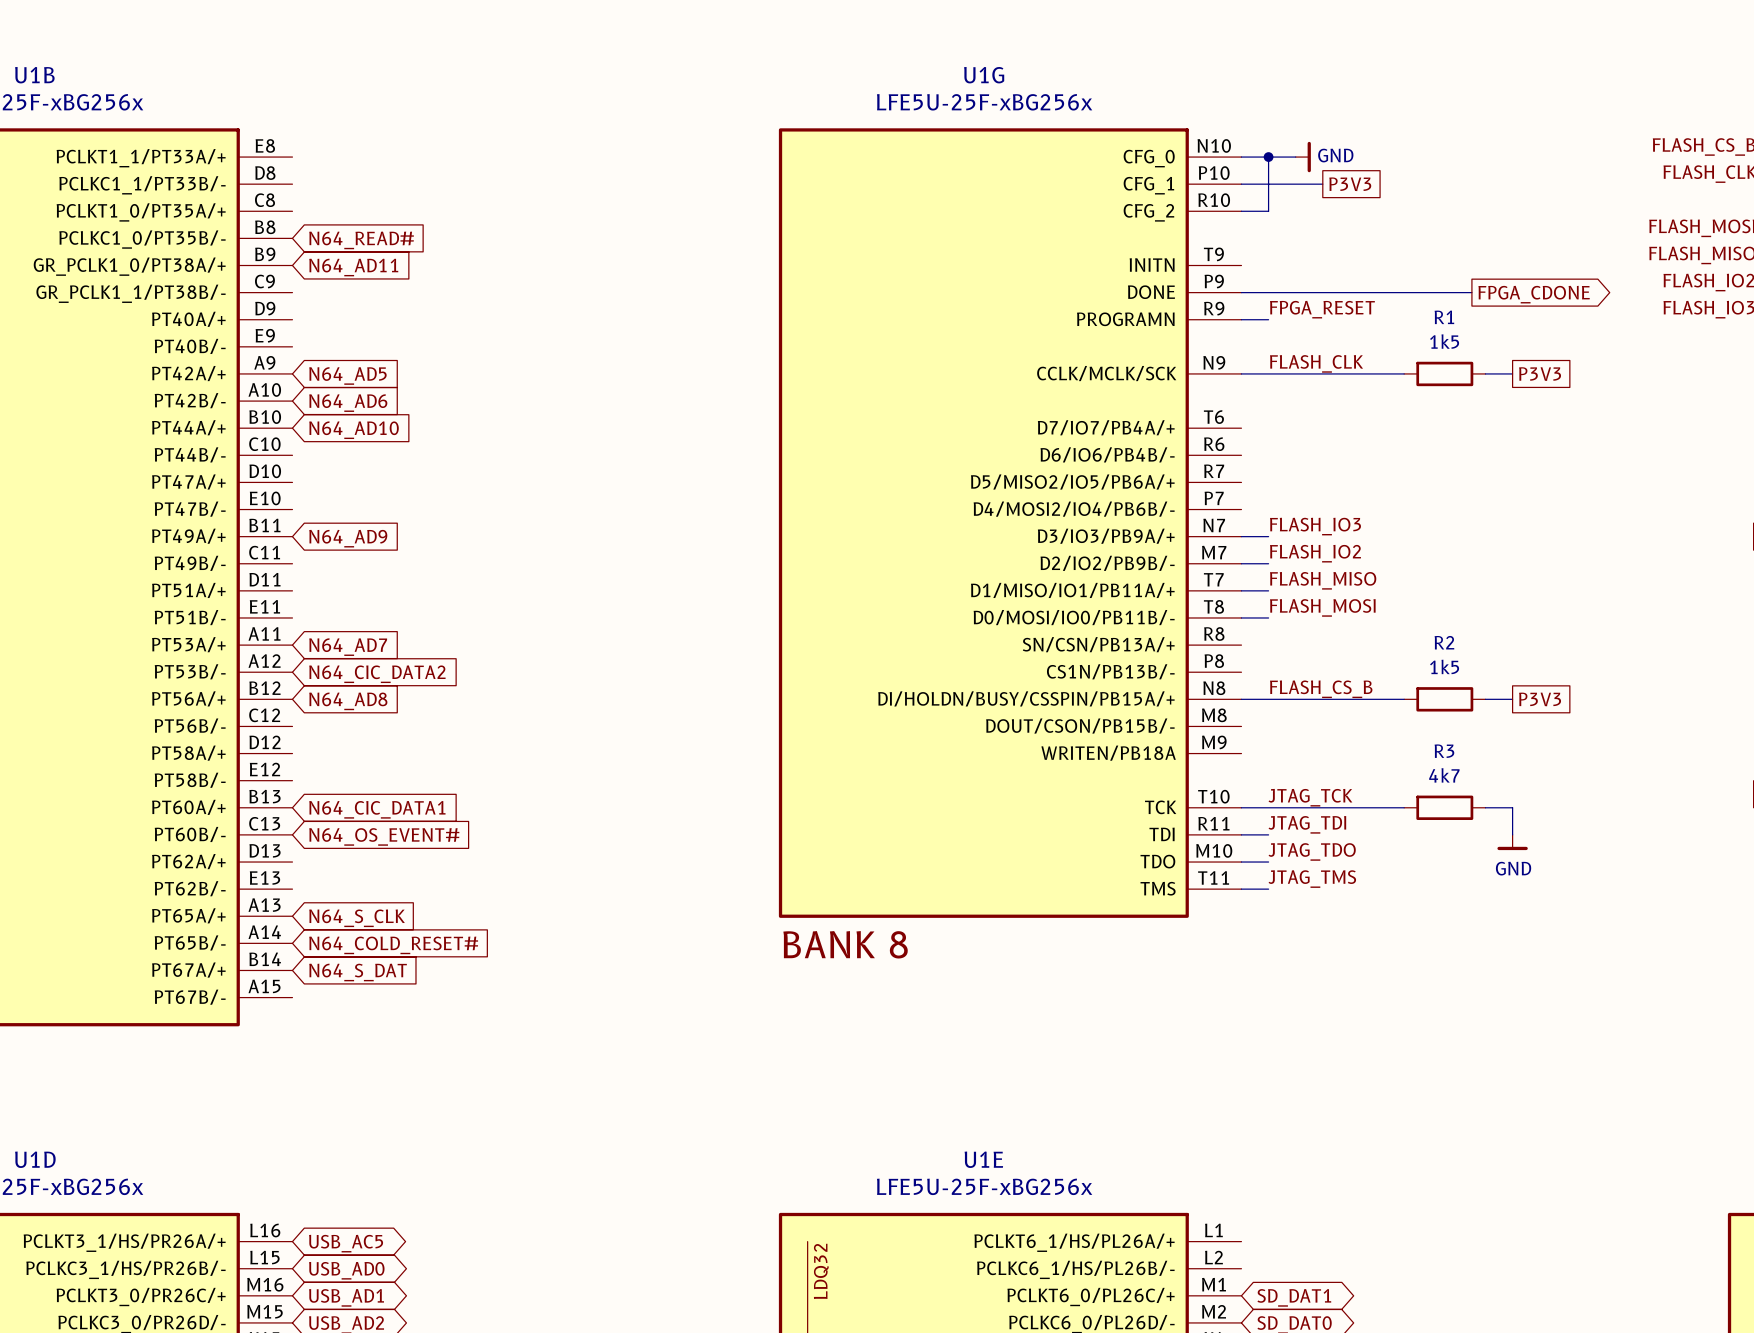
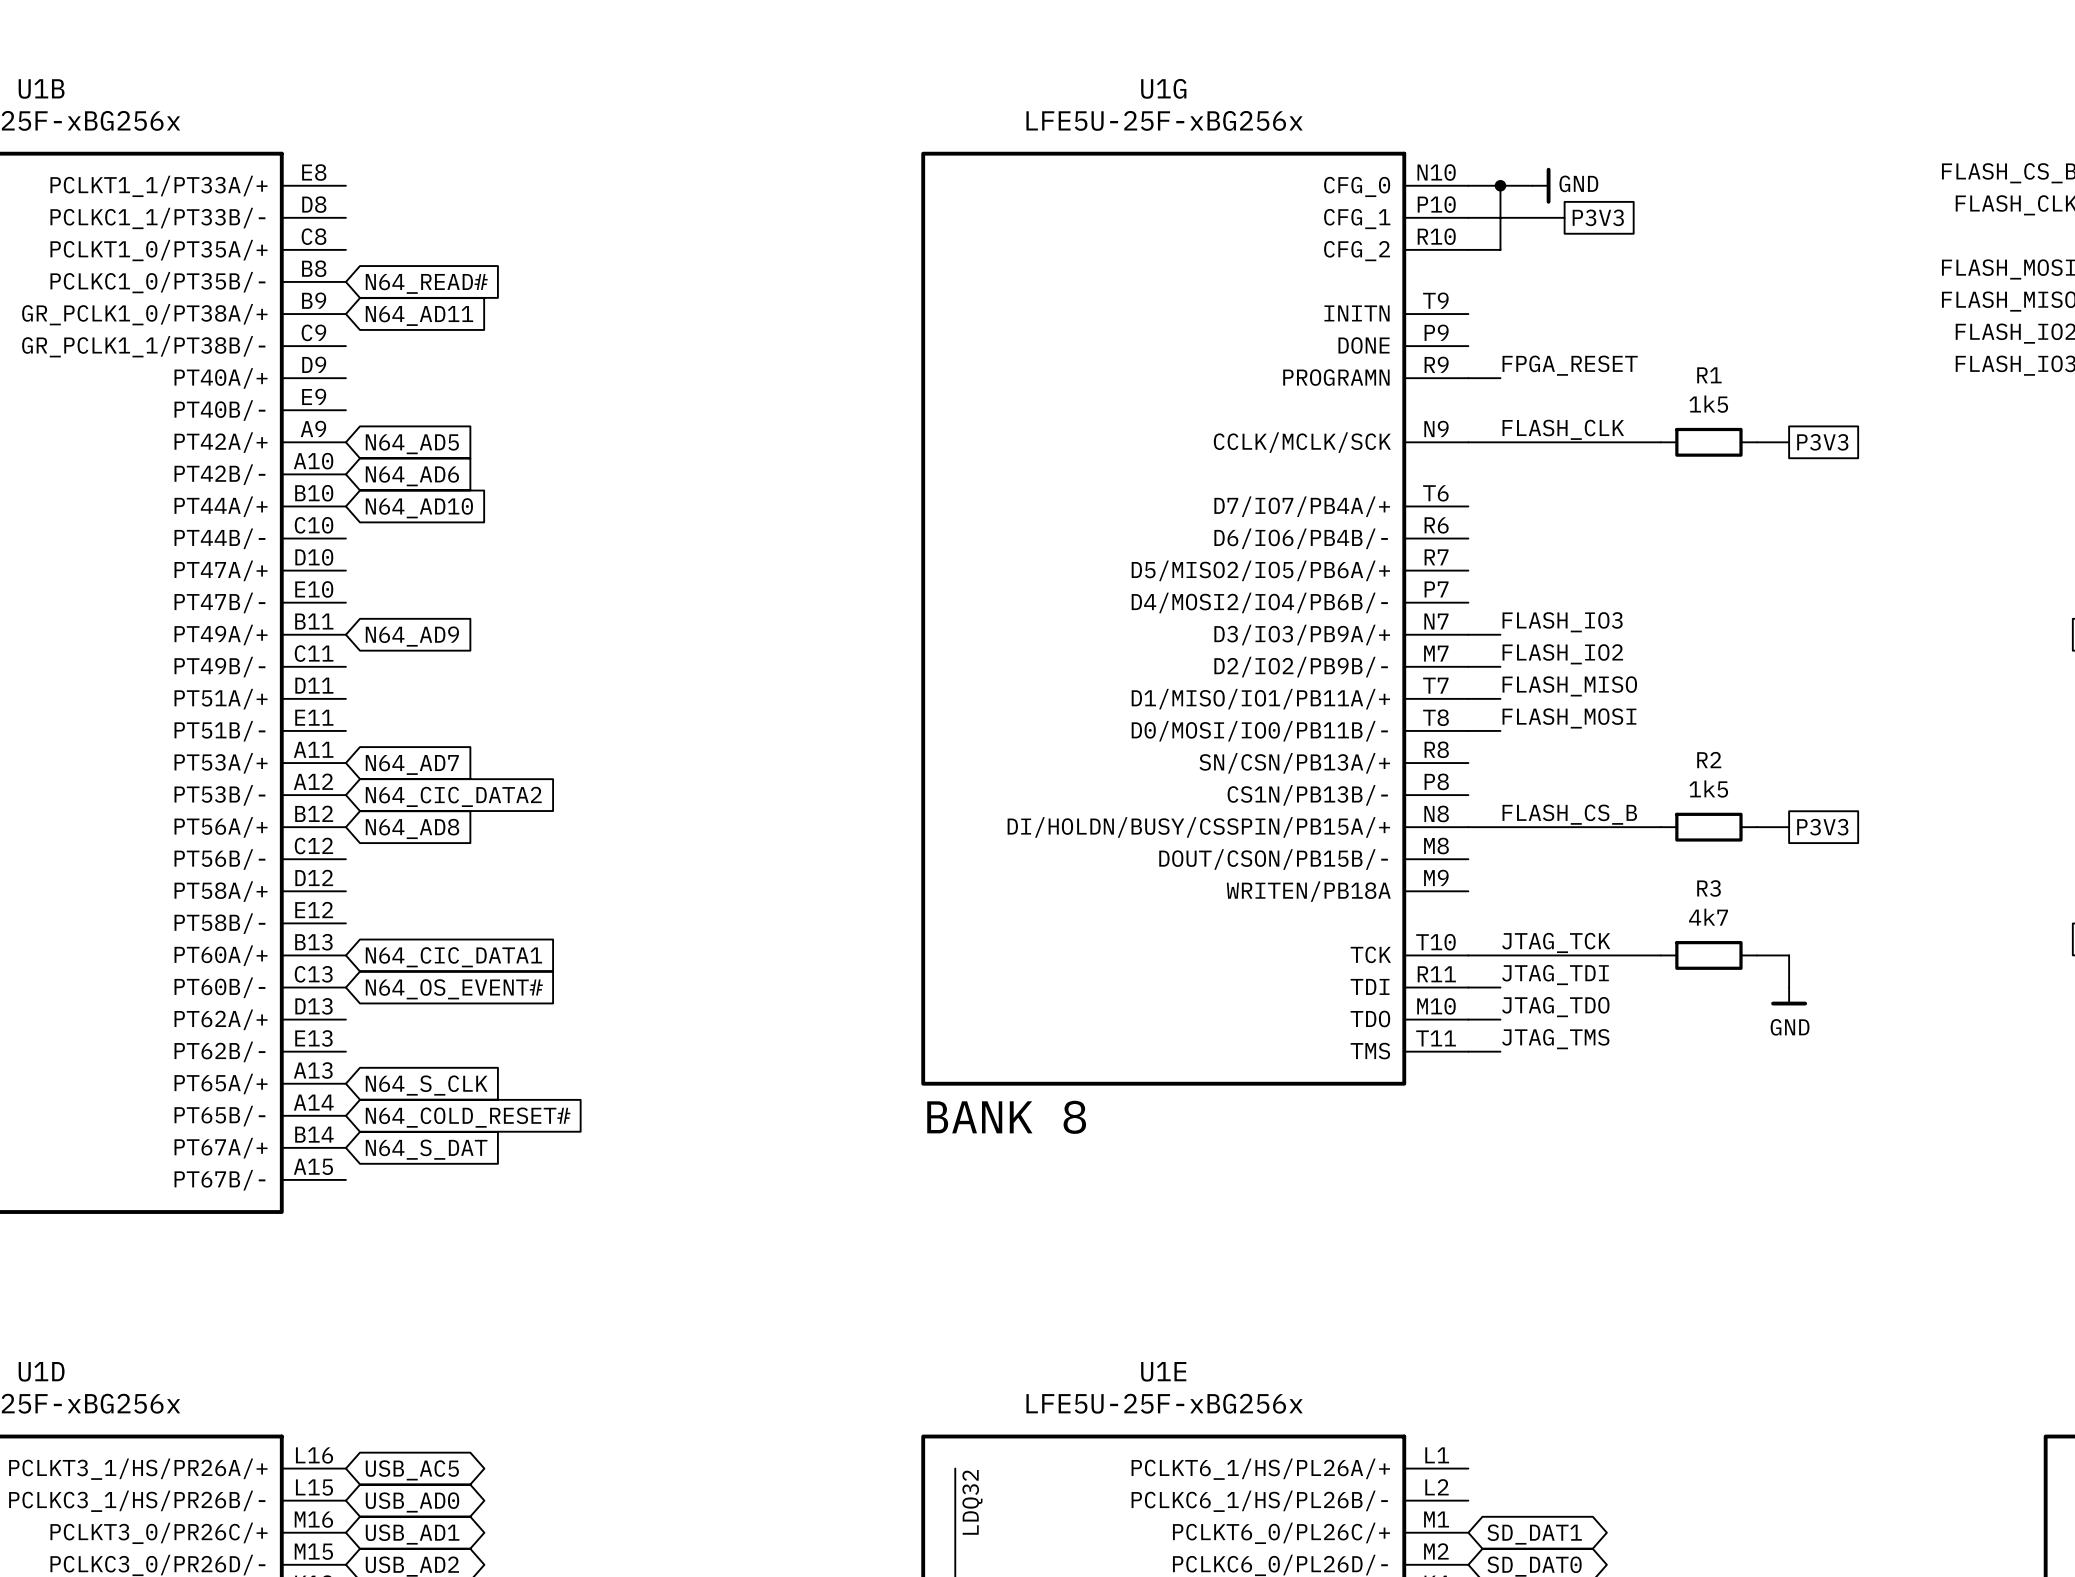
wire: (1241, 292) (1471, 292) -> none
global label: FPGA_CDONE (1534, 294) -> none

